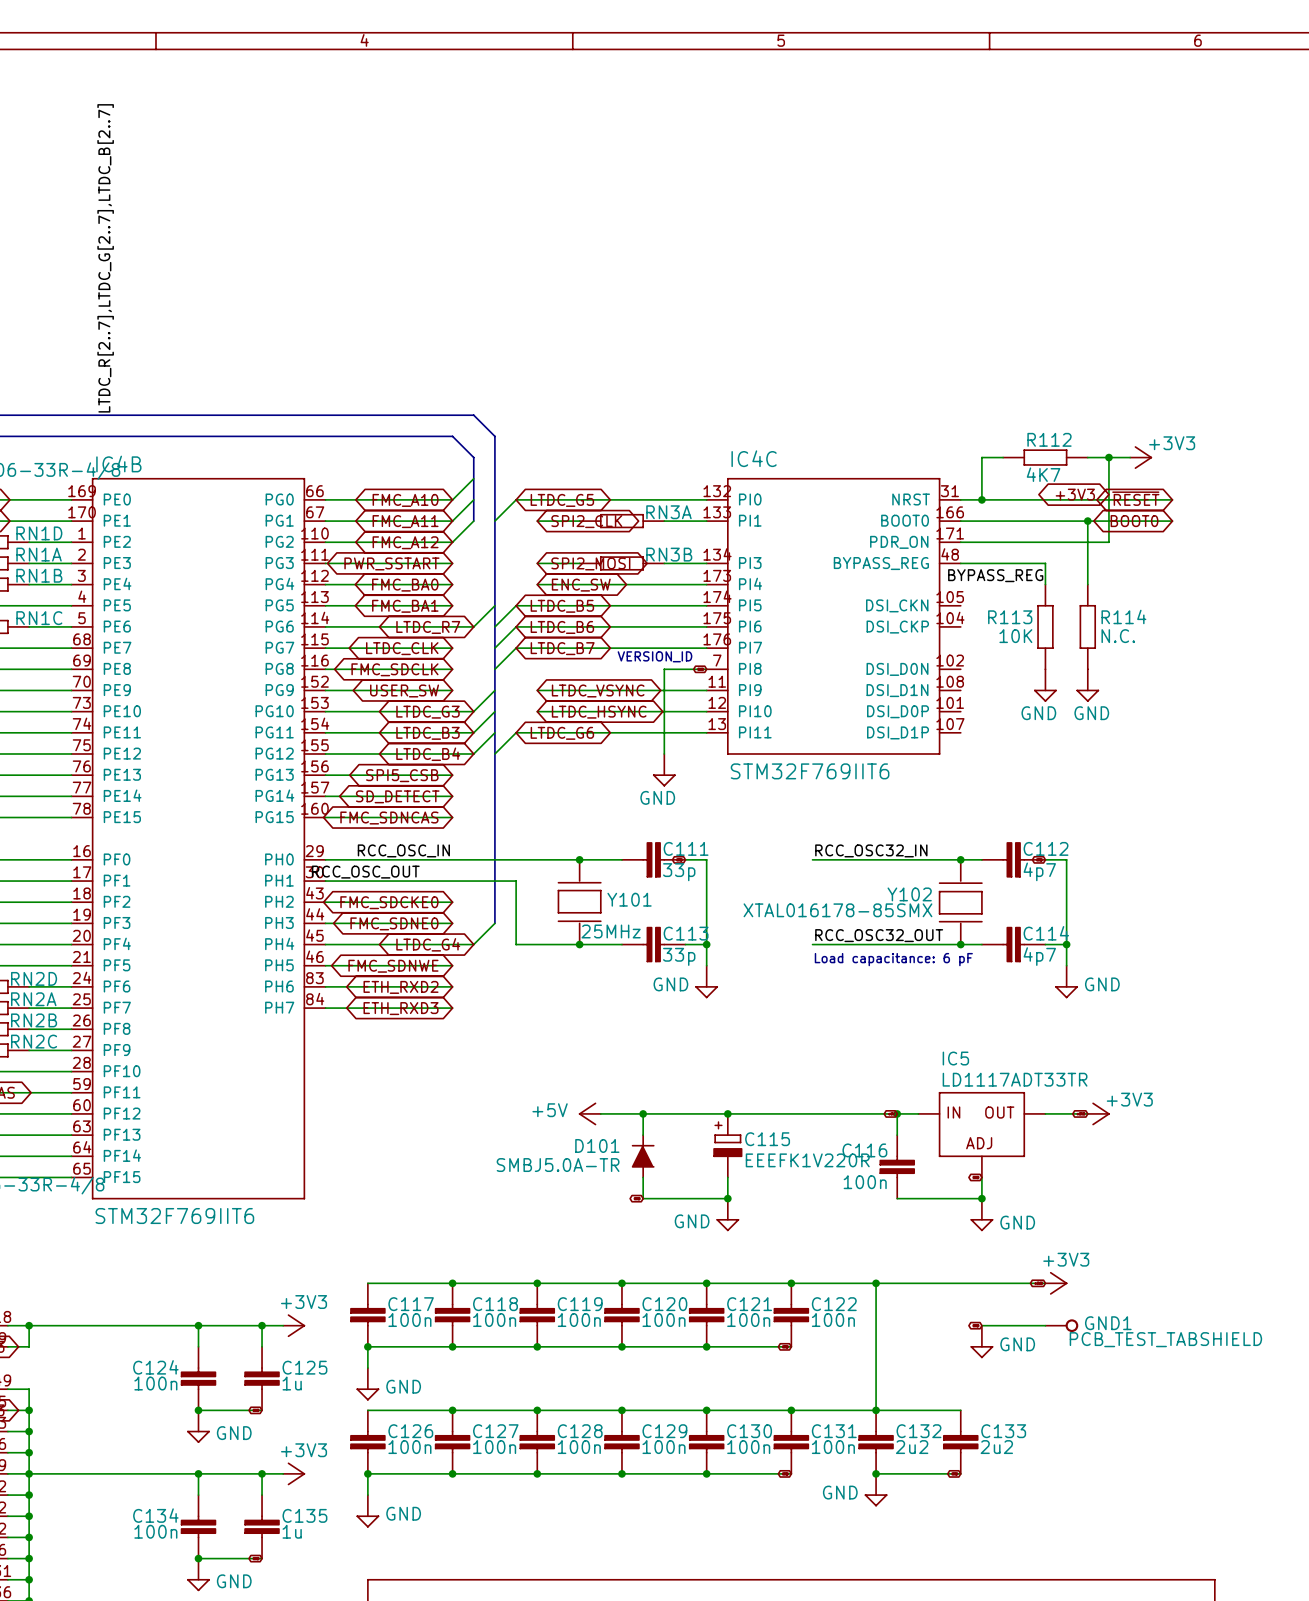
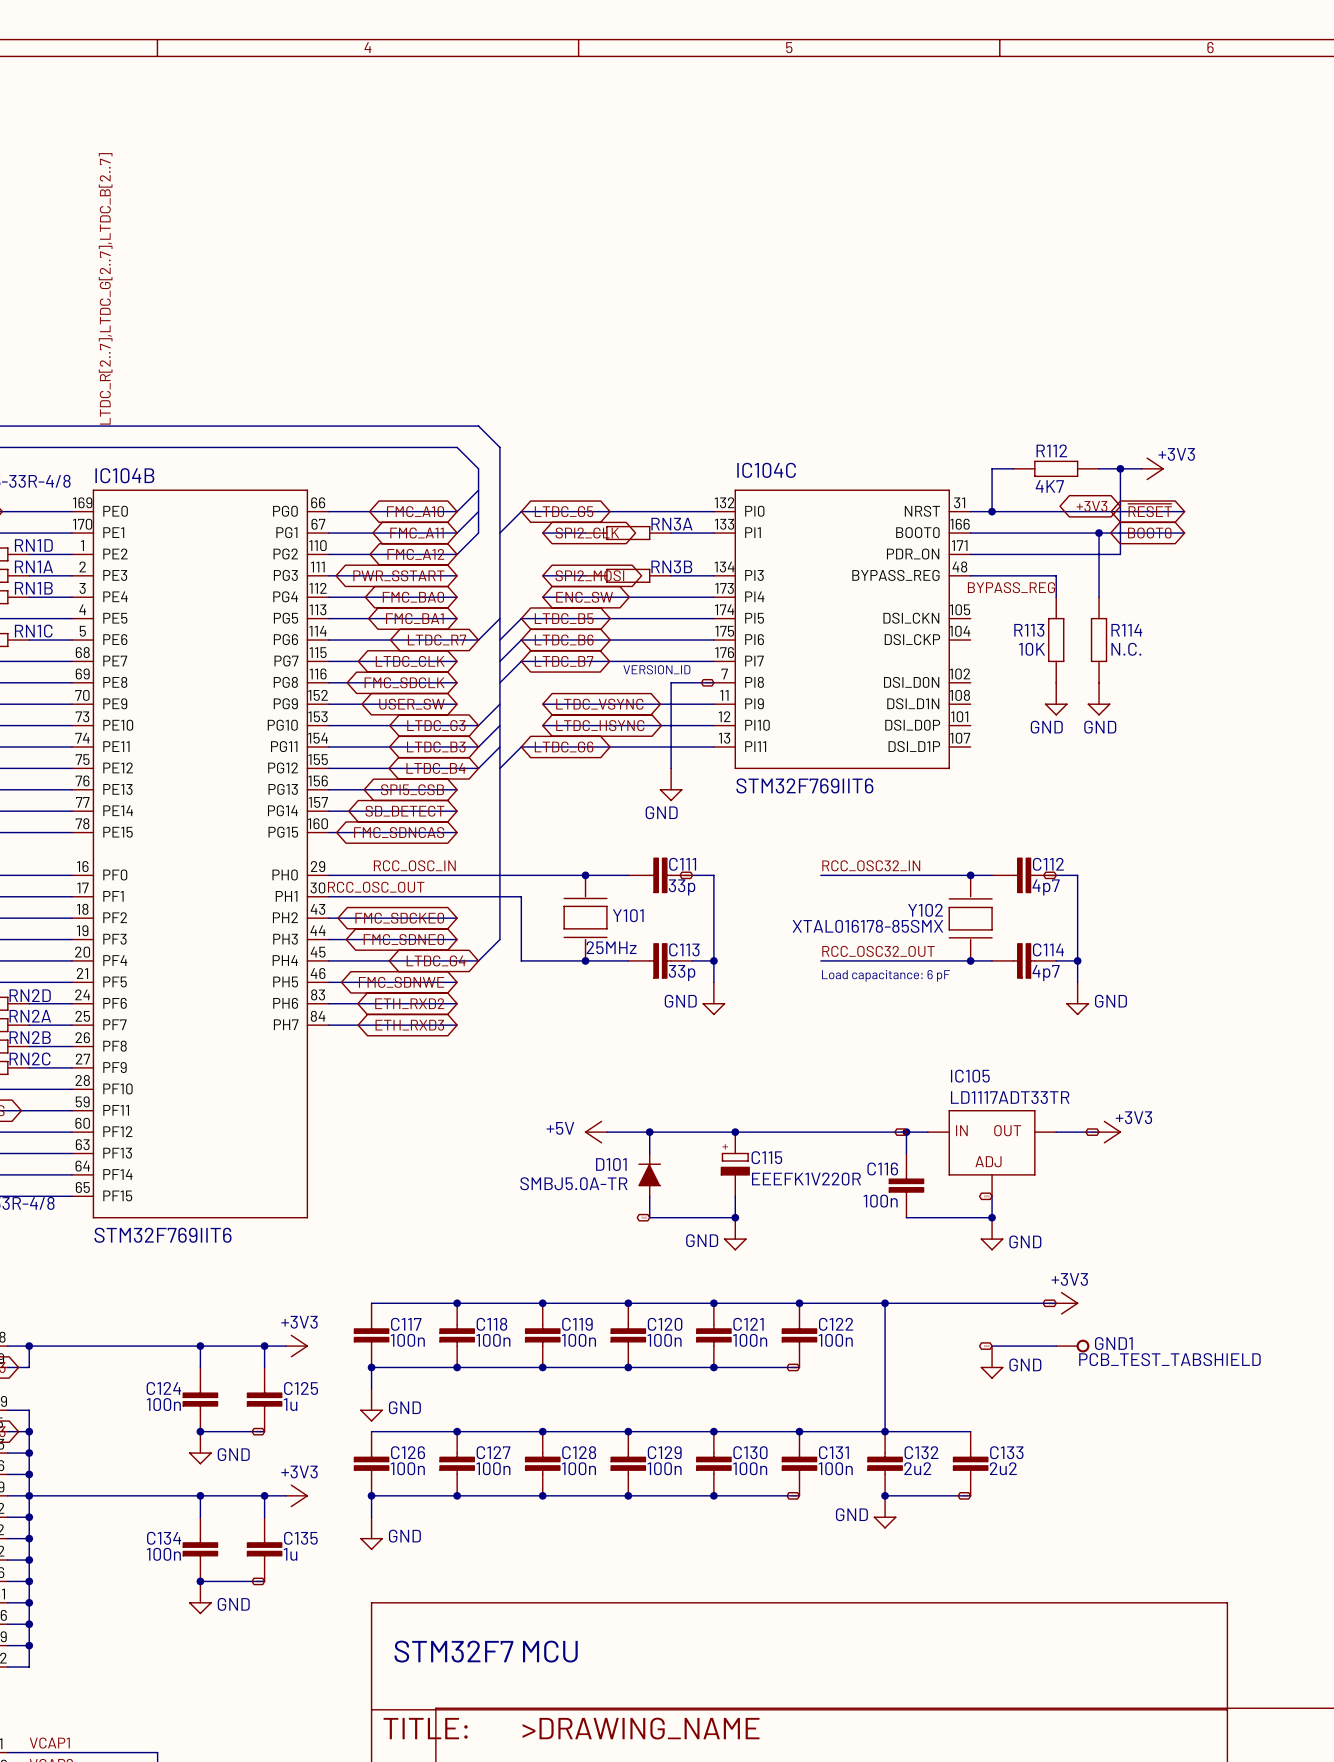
IC4C name: IC4C (754, 458) -> IC104C (766, 470)
IC4B name: IC4B (118, 464) -> IC104B (124, 475)
IC5 name: IC5 (955, 1058) -> IC105 (970, 1076)

